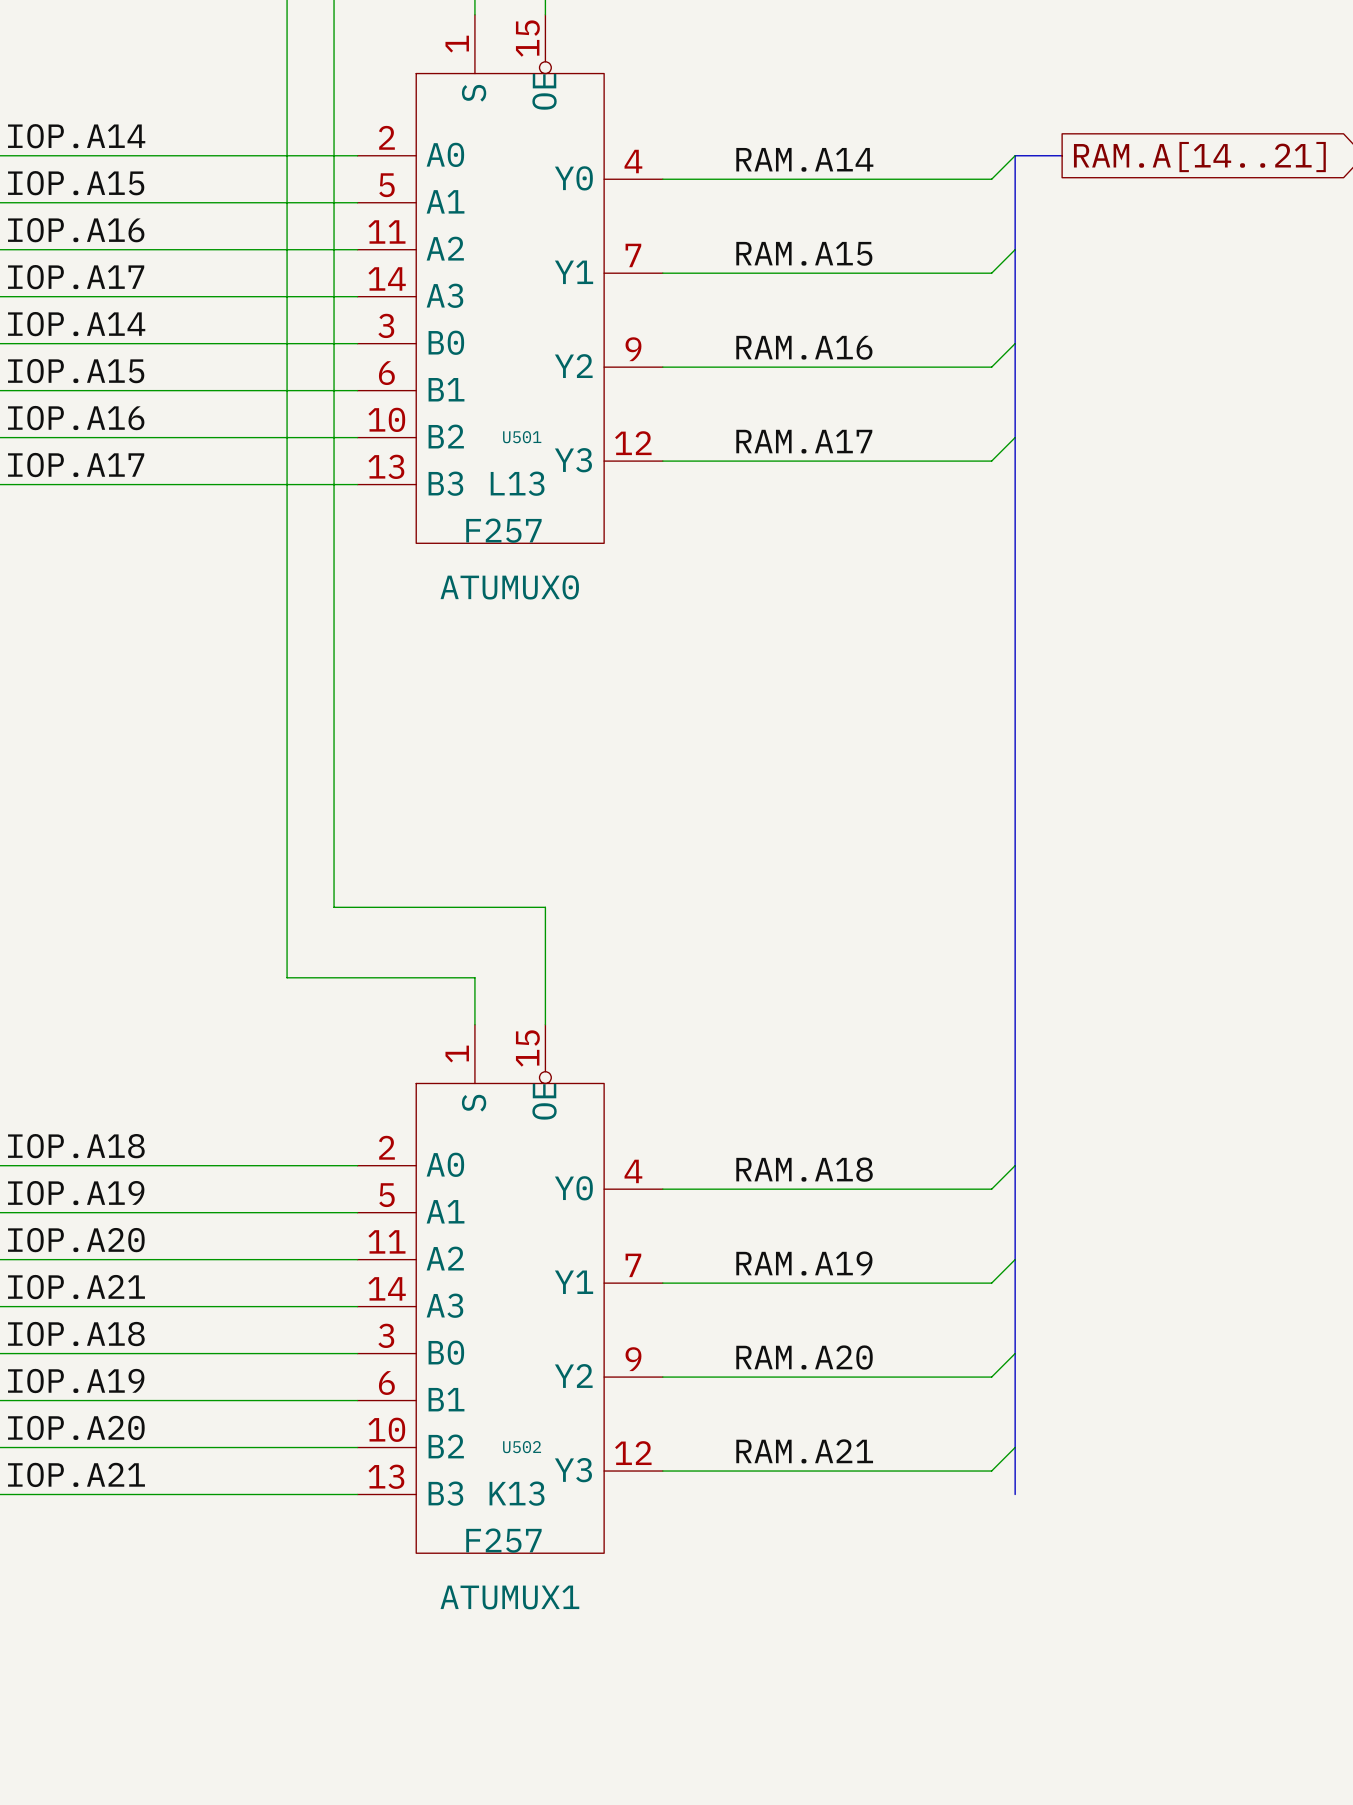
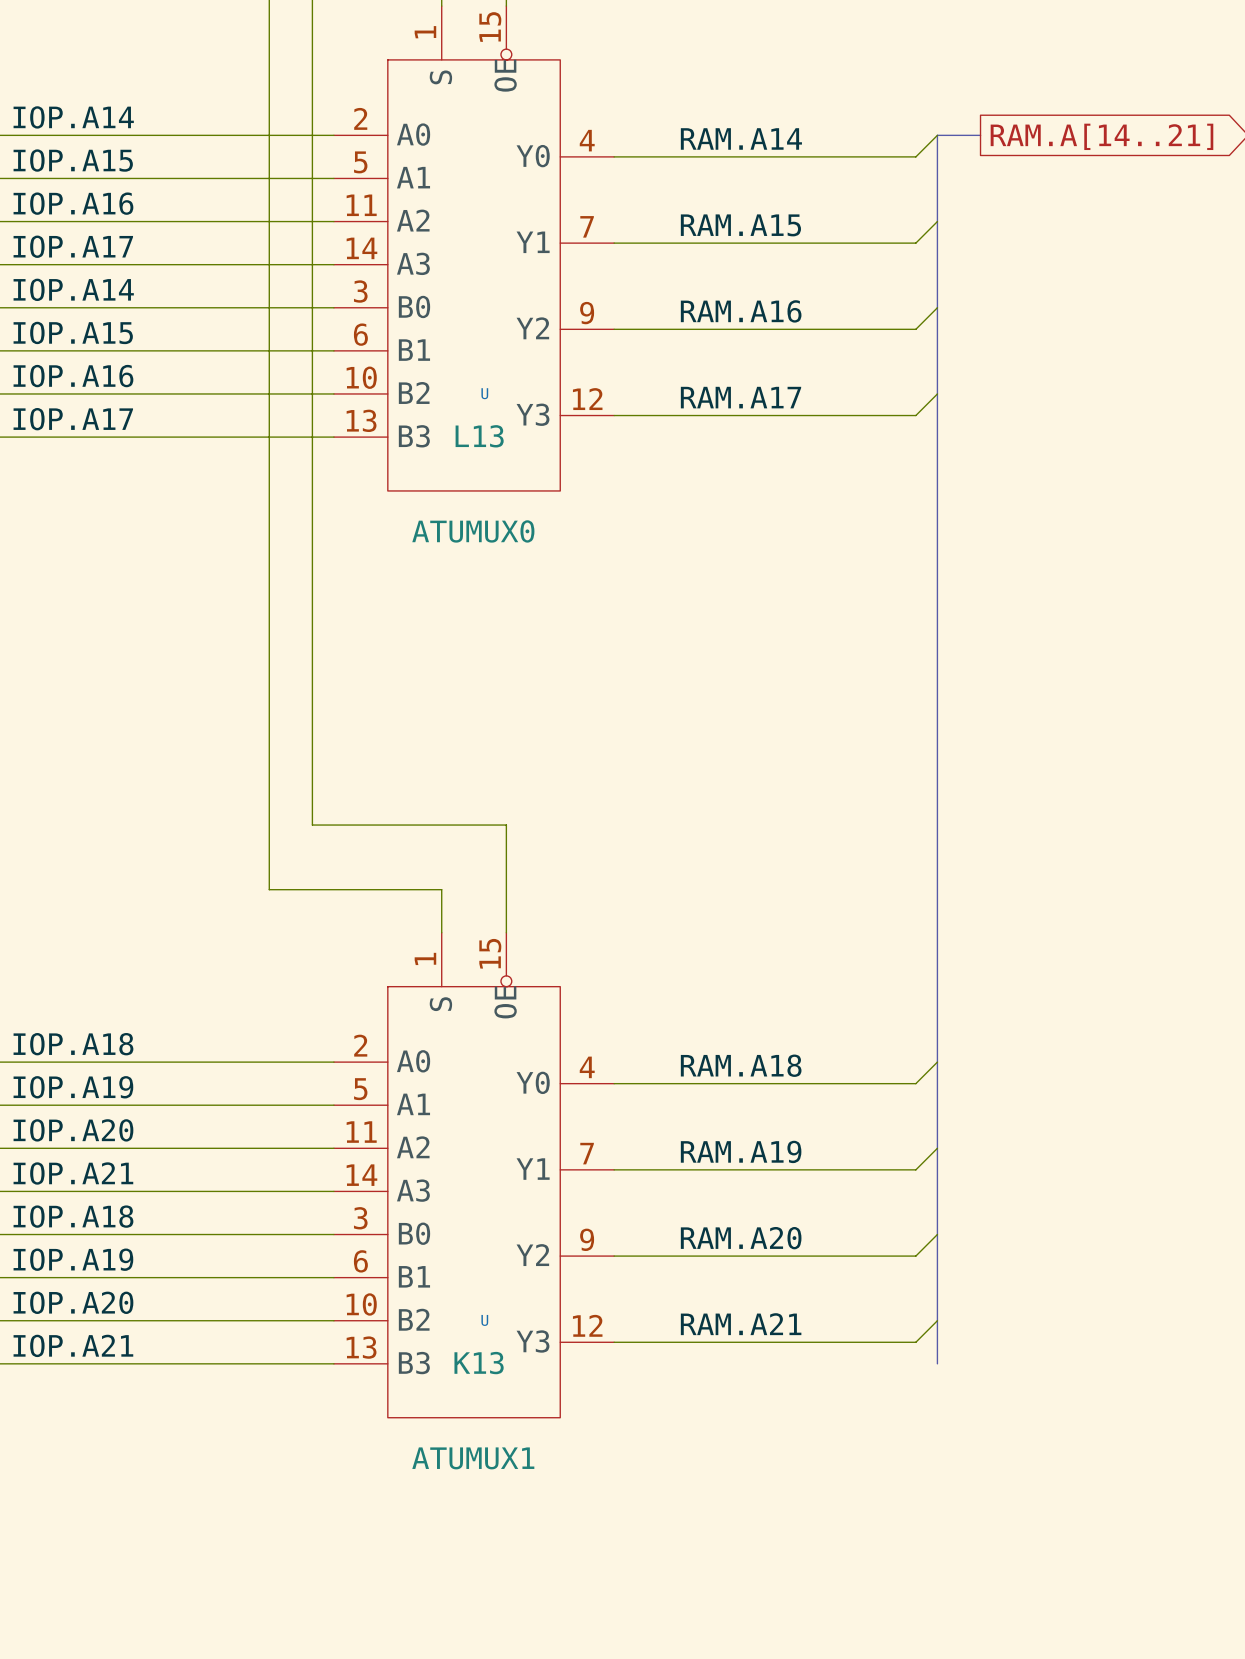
U501 name: U501 (522, 437) -> U (484, 393)
U501 value: F257 (503, 530) -> none
U502 name: U502 (522, 1447) -> U (484, 1320)
U502 value: F257 (503, 1540) -> none

